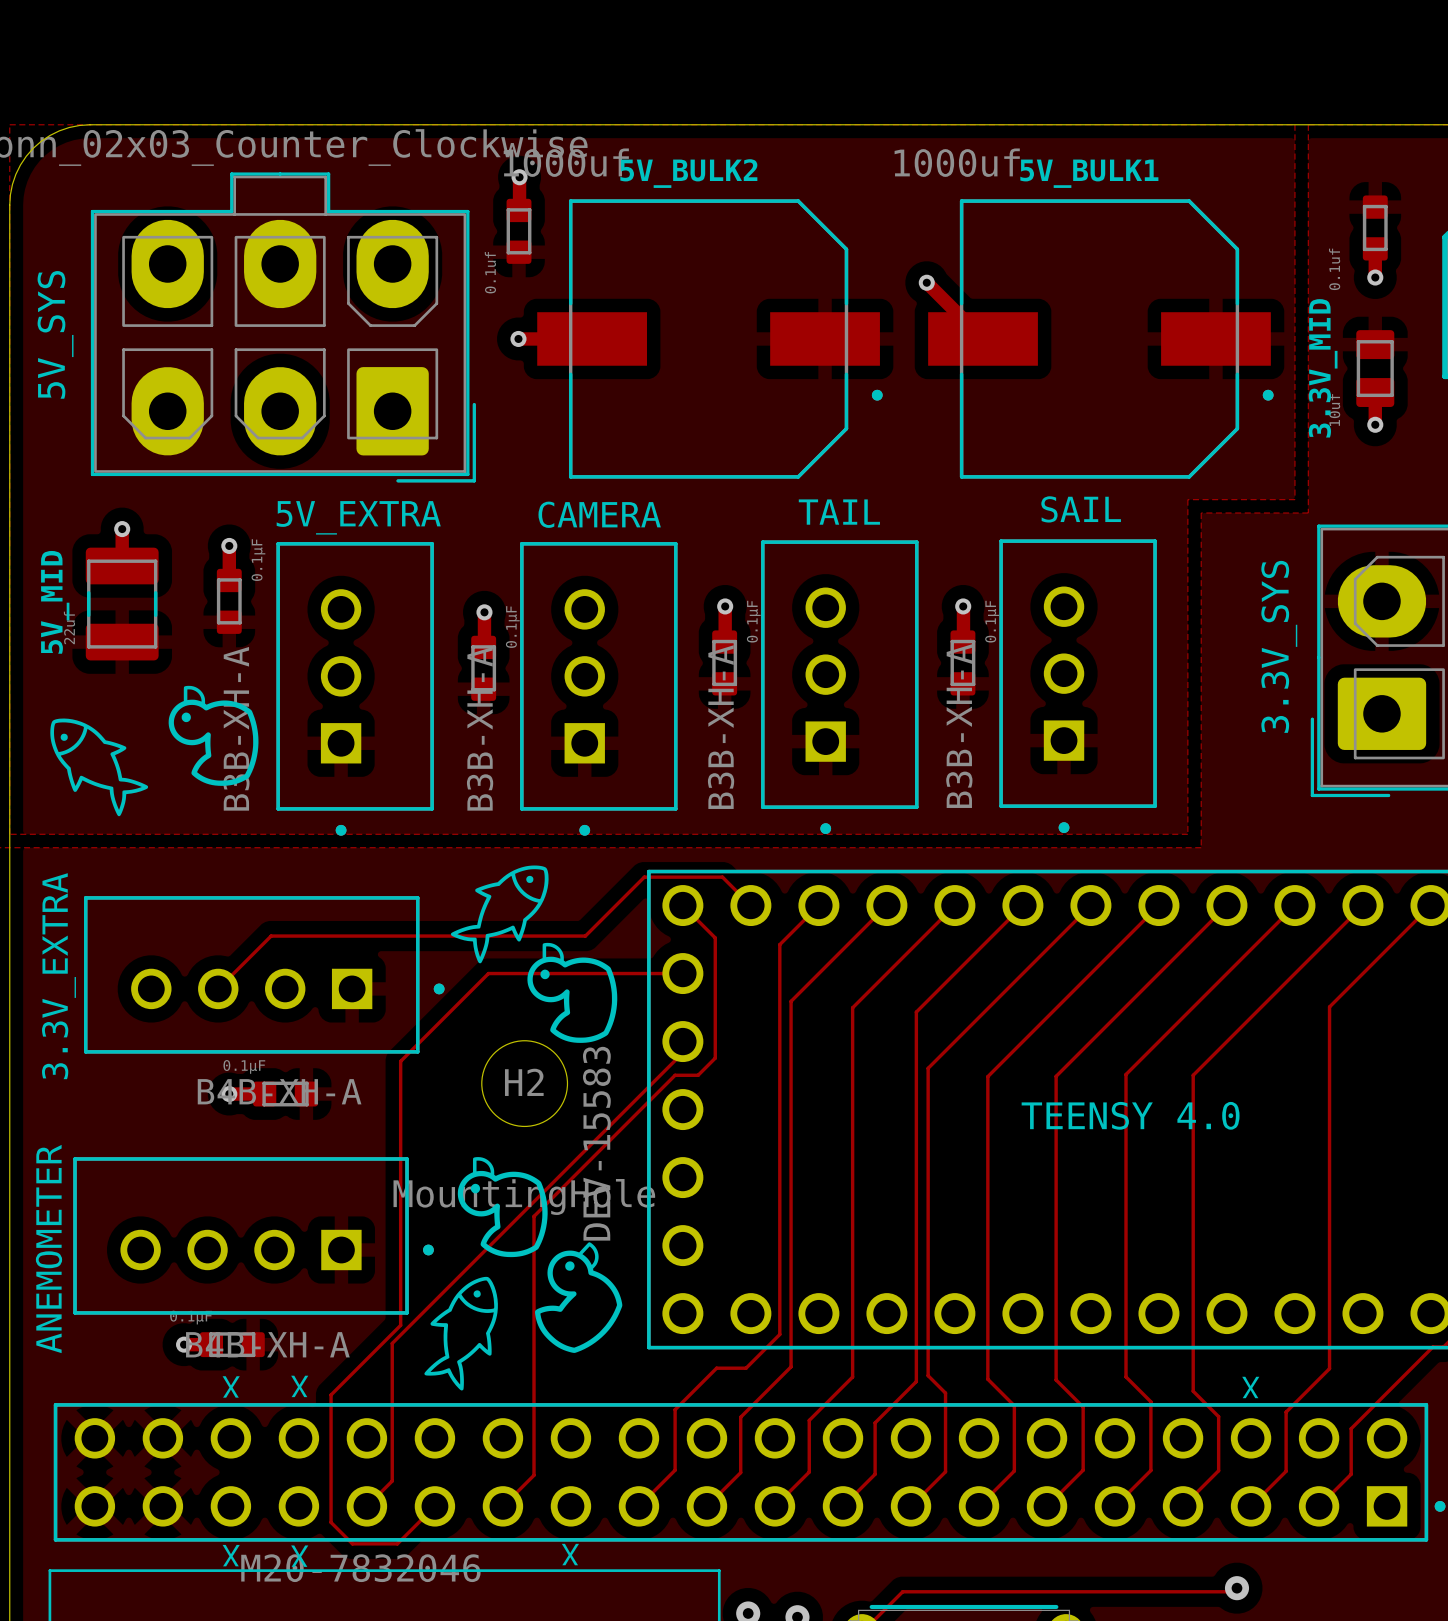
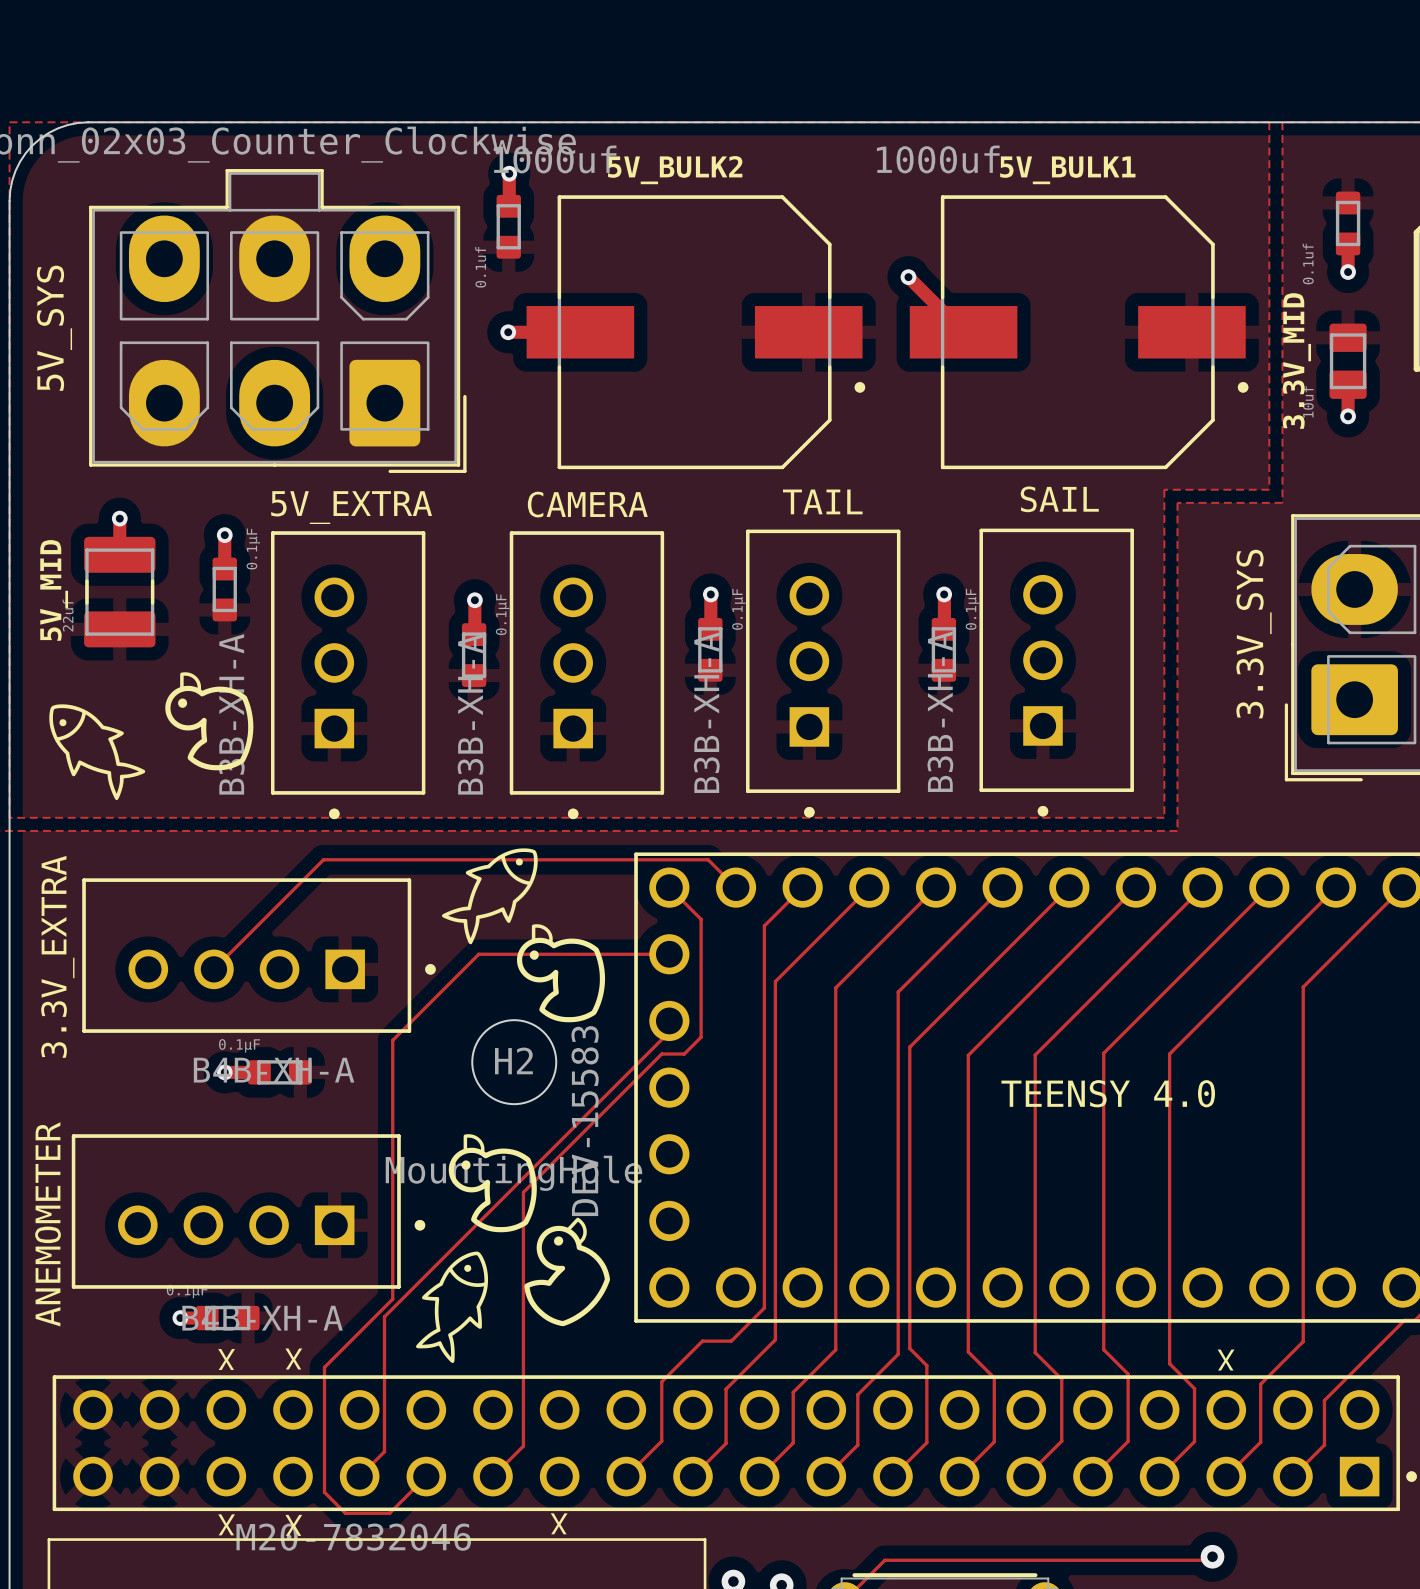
track: (644, 877) (585, 936) (271, 936) -> (631, 859) (323, 859) (265, 917)

